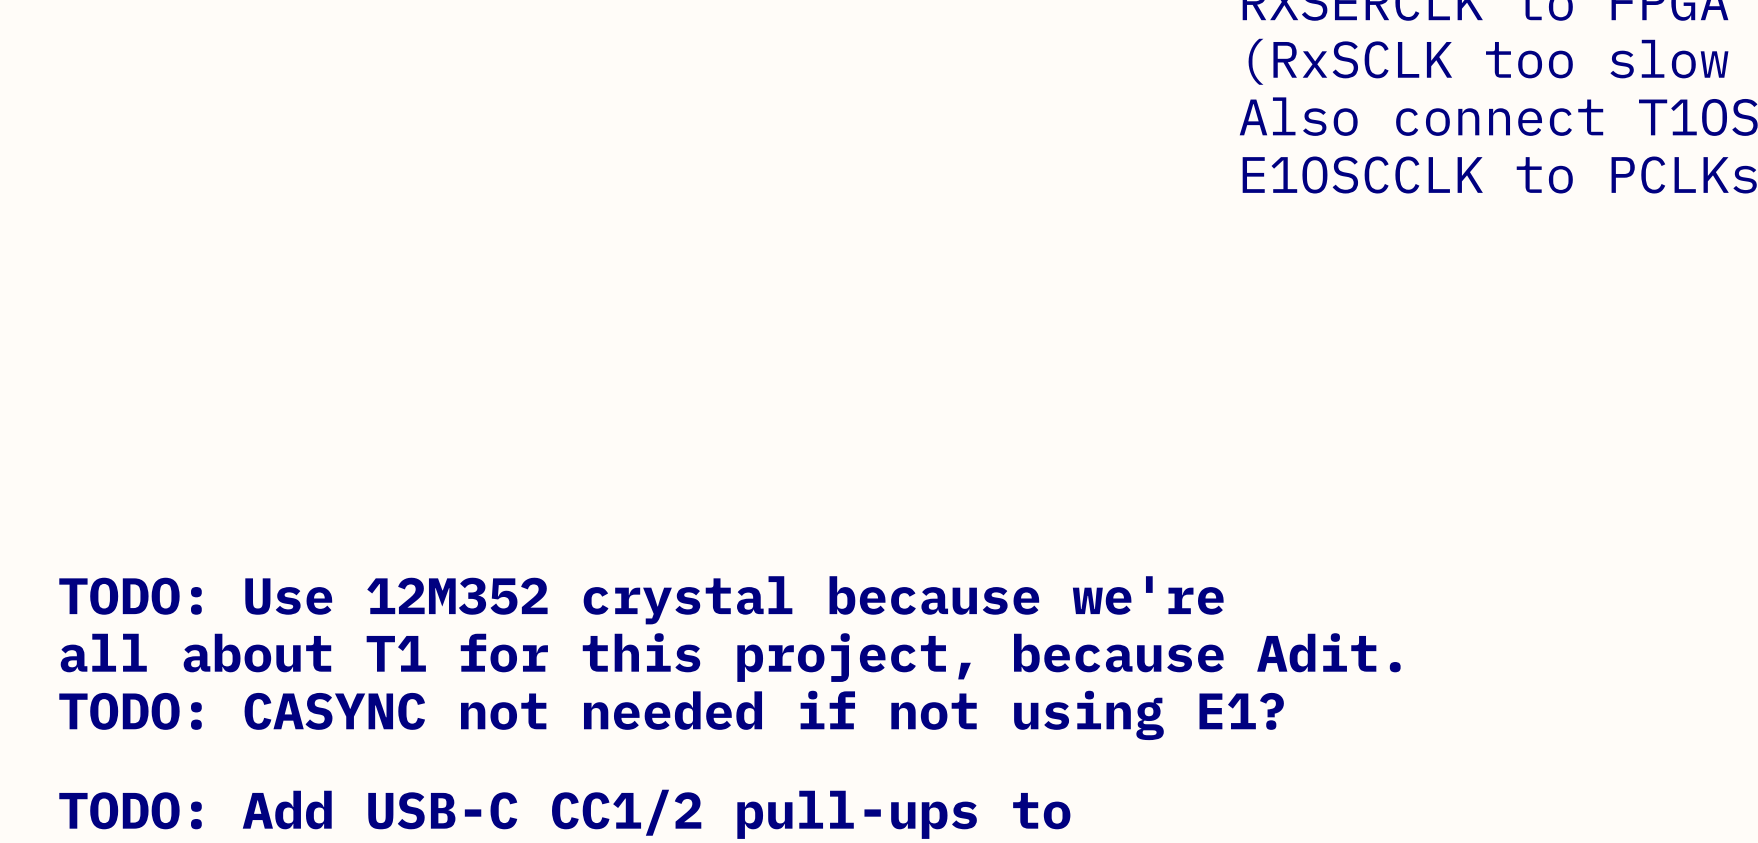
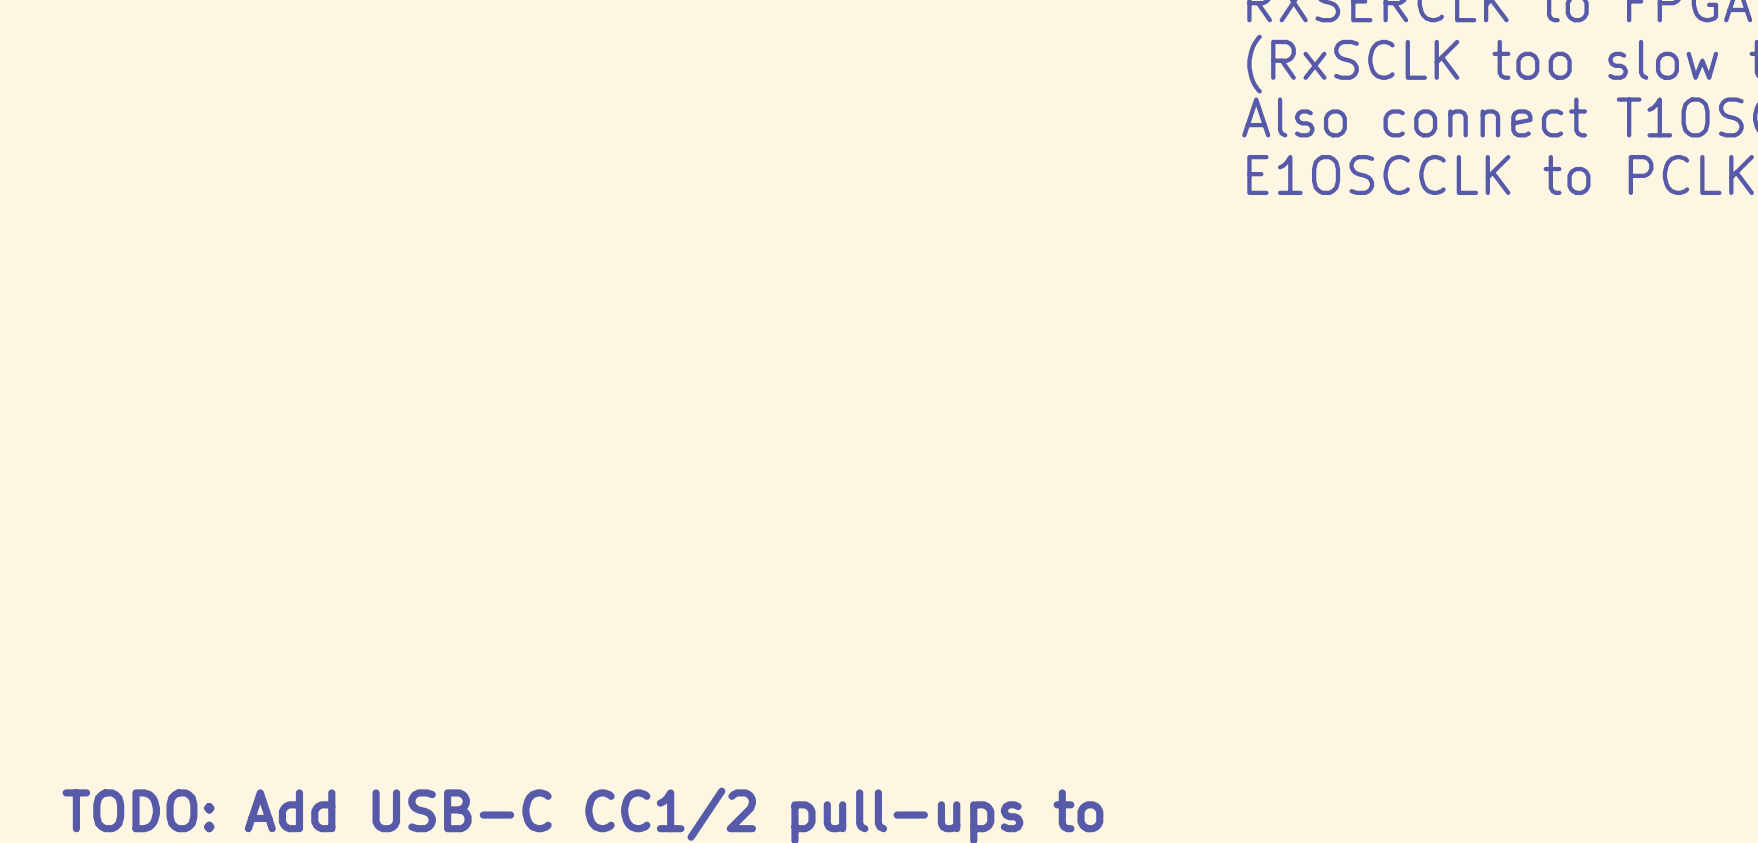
text: TODO: Use 12M352 crystal because we're (641, 600) -> none
text: all about T1 for this project, because Adit. (730, 657) -> none
text: TODO: CASYNC not needed if not using E1? (671, 715) -> none

